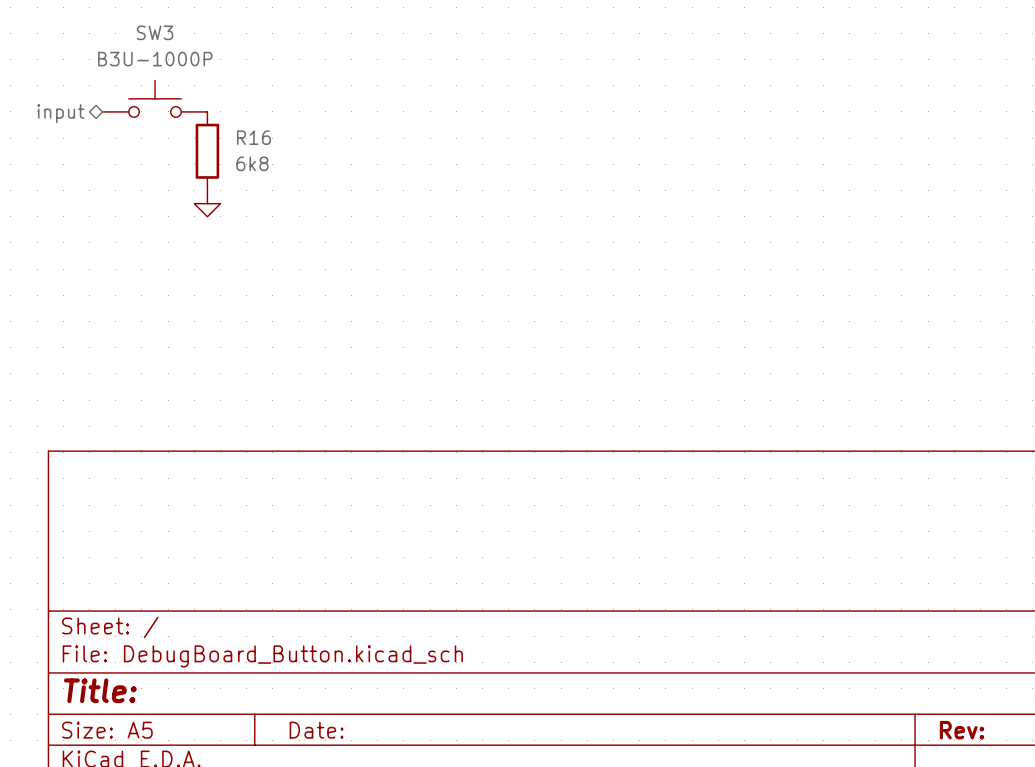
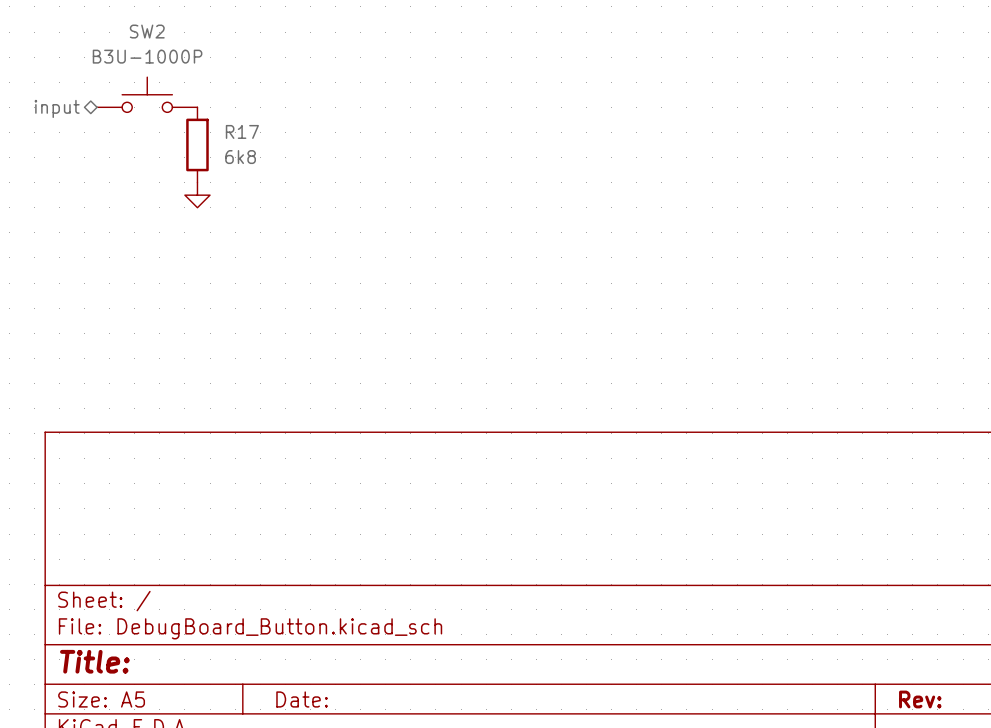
SW3 name: SW3 (155, 32) -> SW2 (147, 31)
R16 name: R16 (253, 137) -> R17 (242, 131)

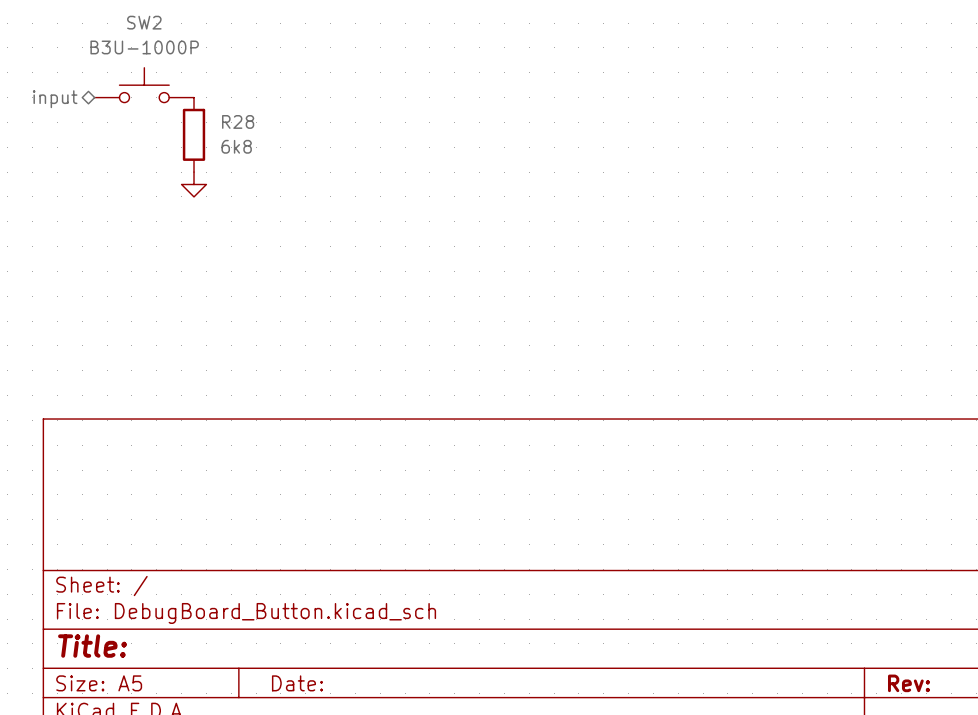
R17 name: R17 (242, 131) -> R28 (238, 121)

